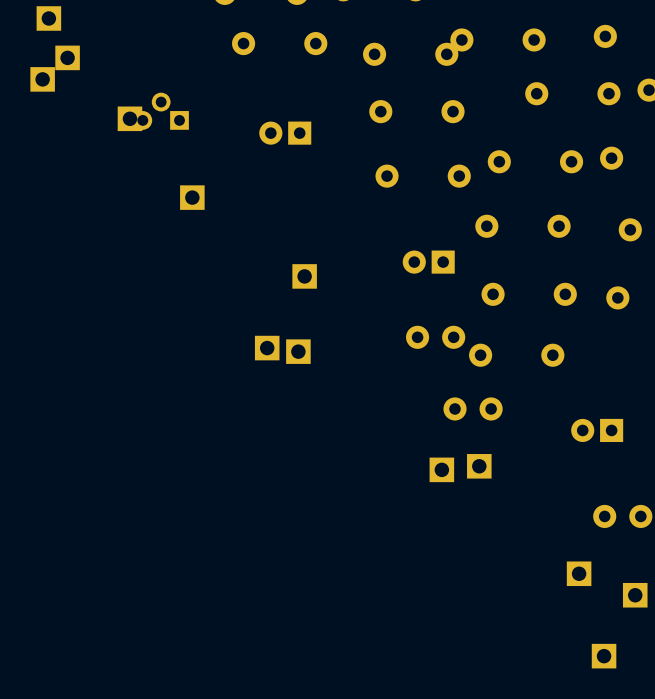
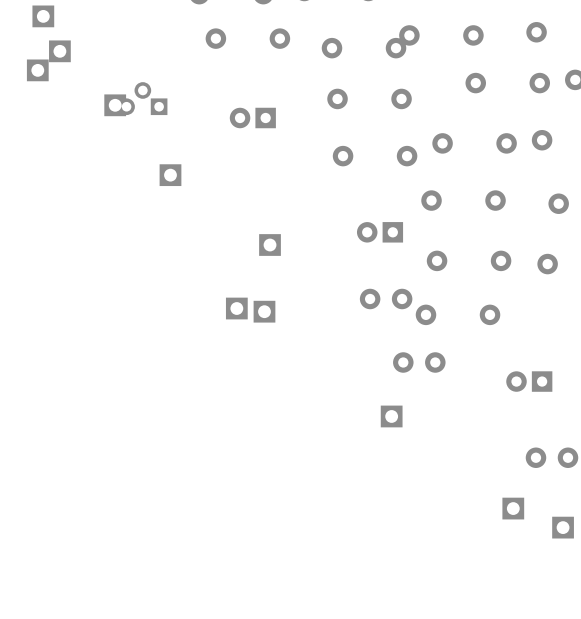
part: (479, 466) -> none
part: (604, 656) -> none

